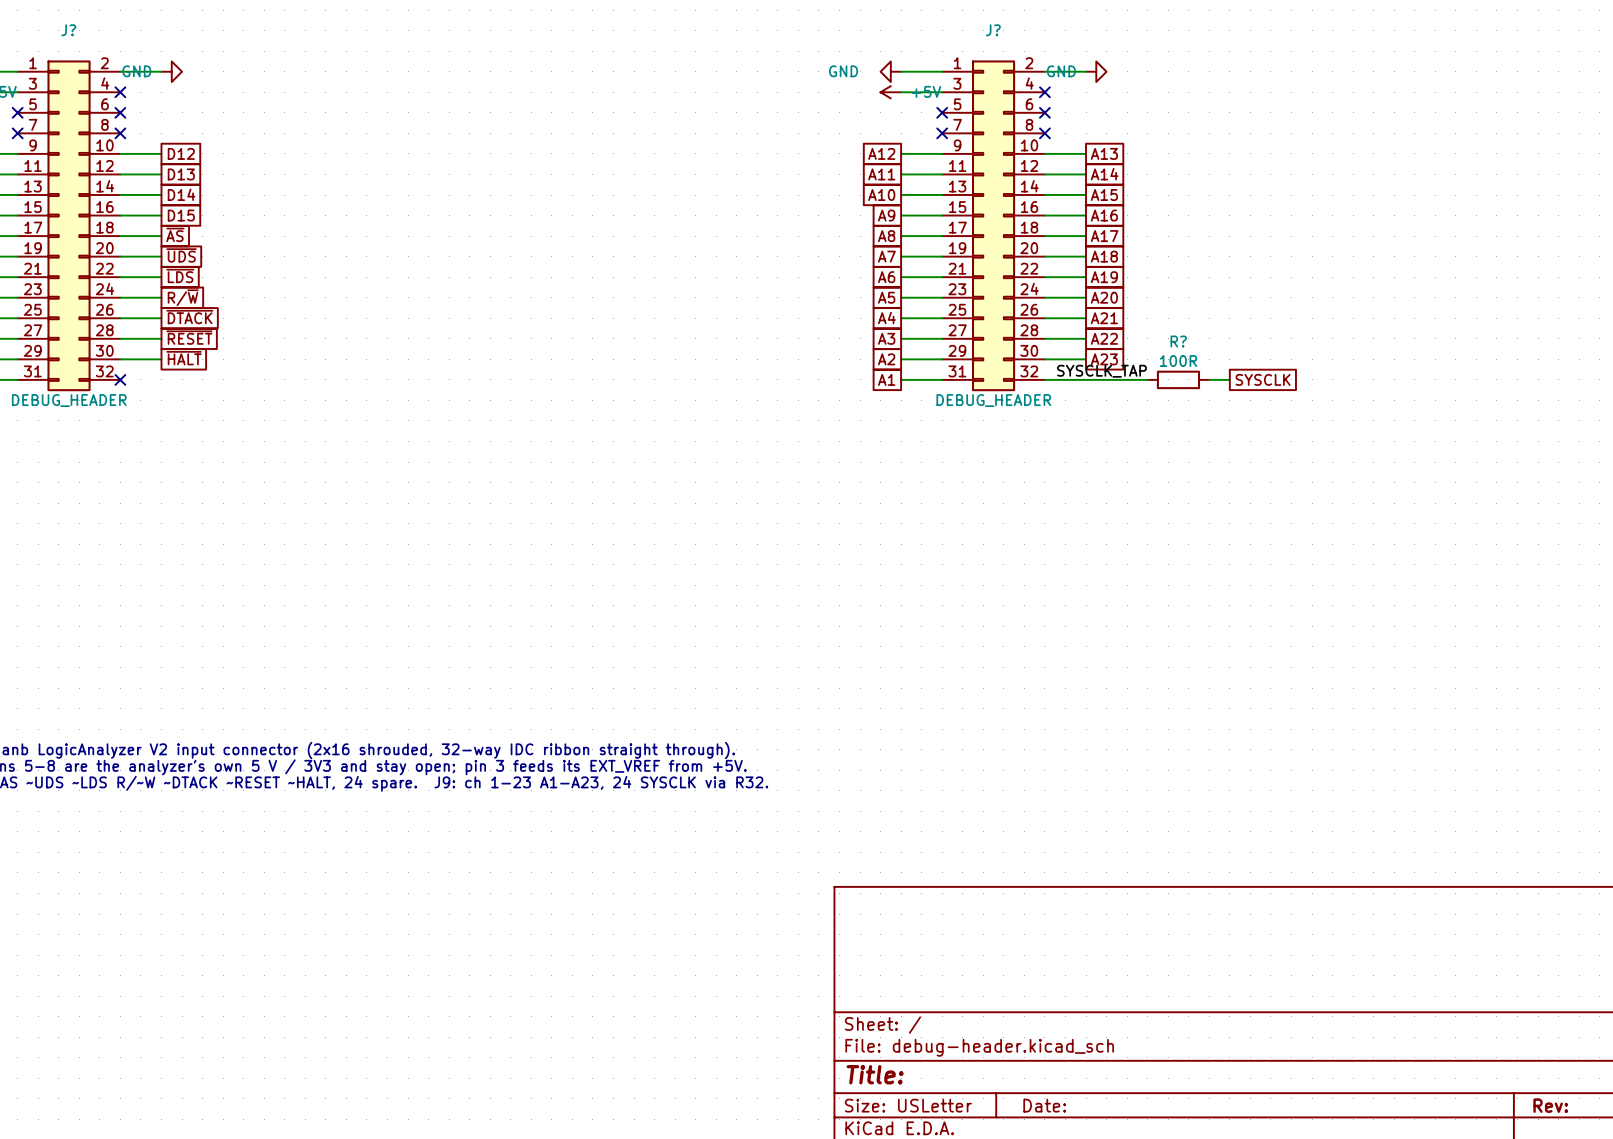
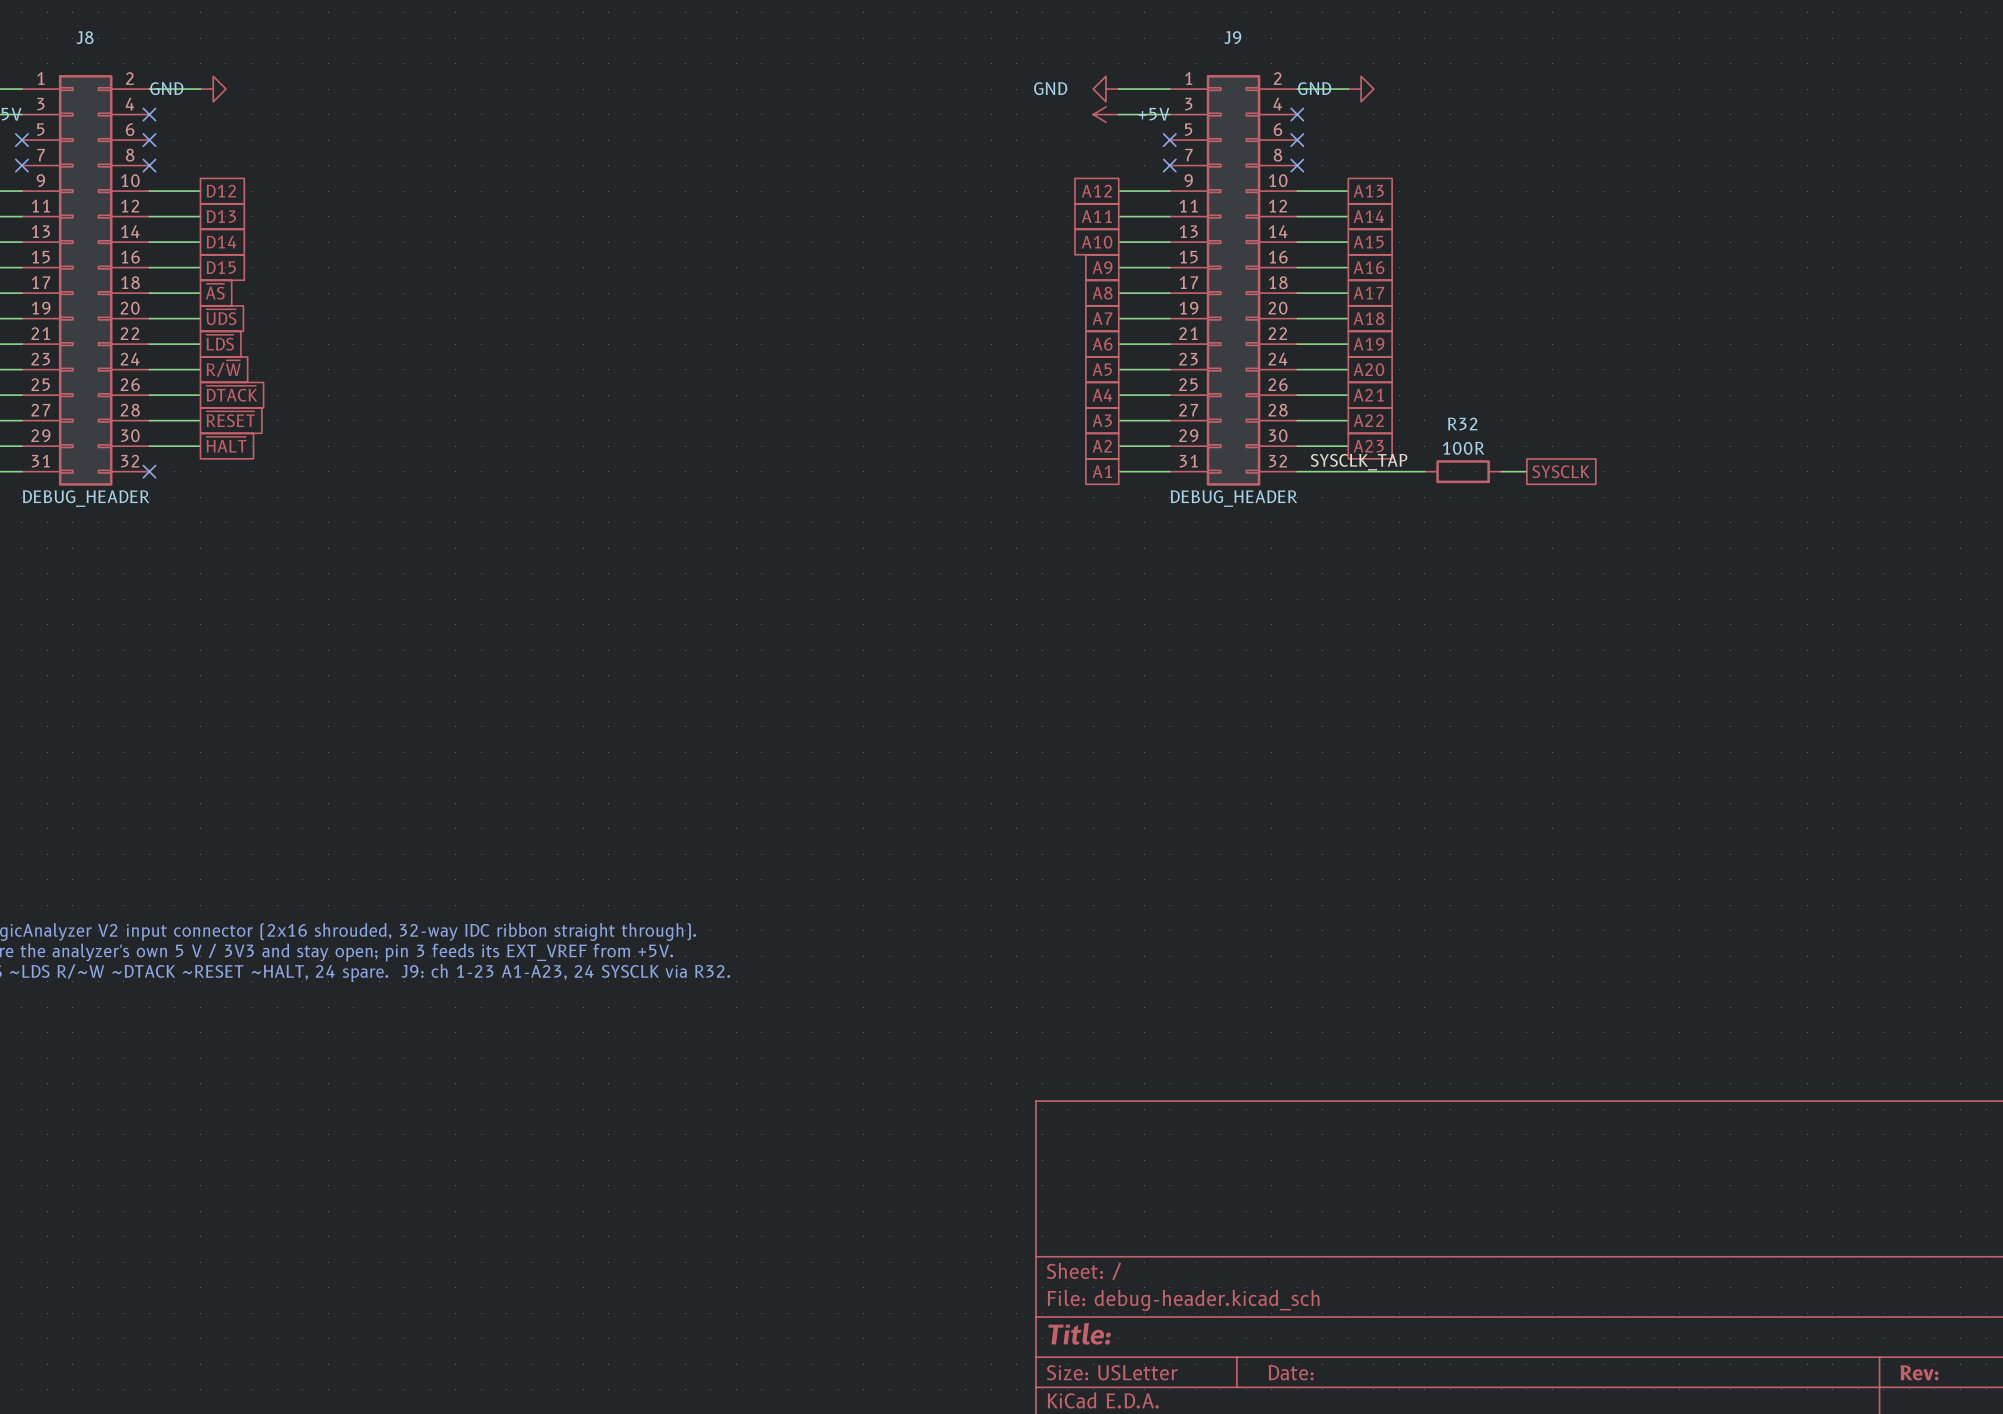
J? name: J? (68, 30) -> J8 (85, 37)
J? name: J? (993, 30) -> J9 (1232, 37)
R? name: R? (1178, 341) -> R32 (1462, 424)

